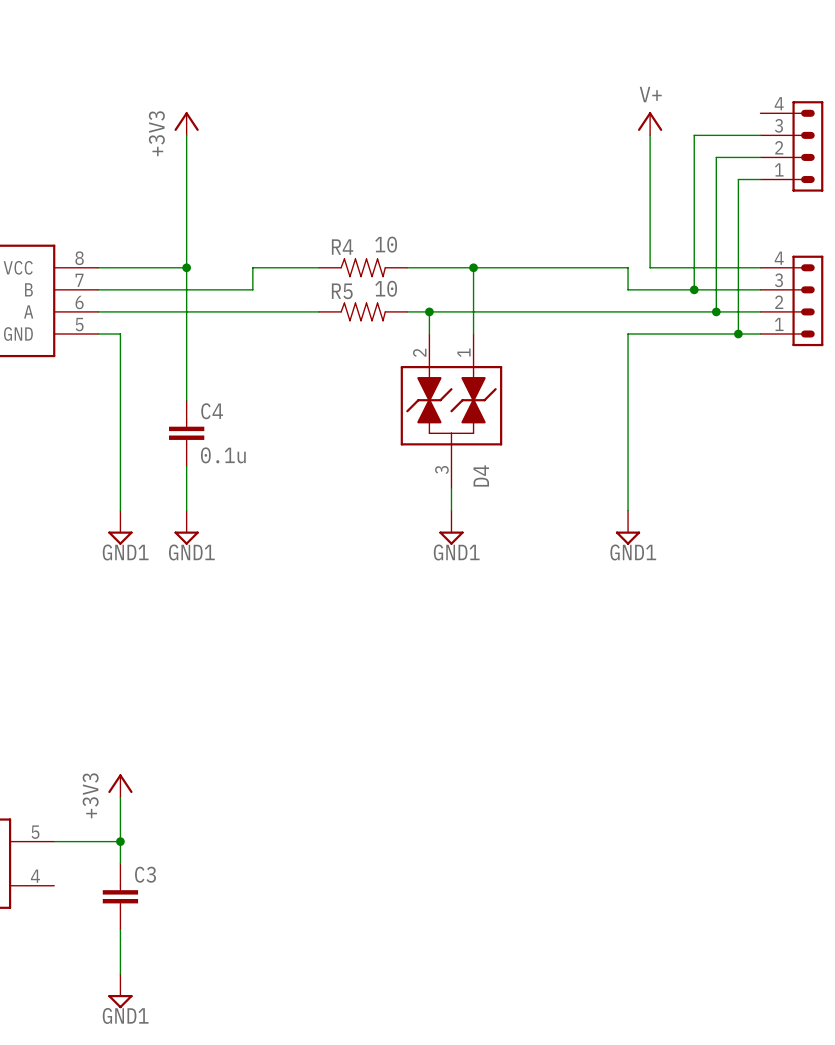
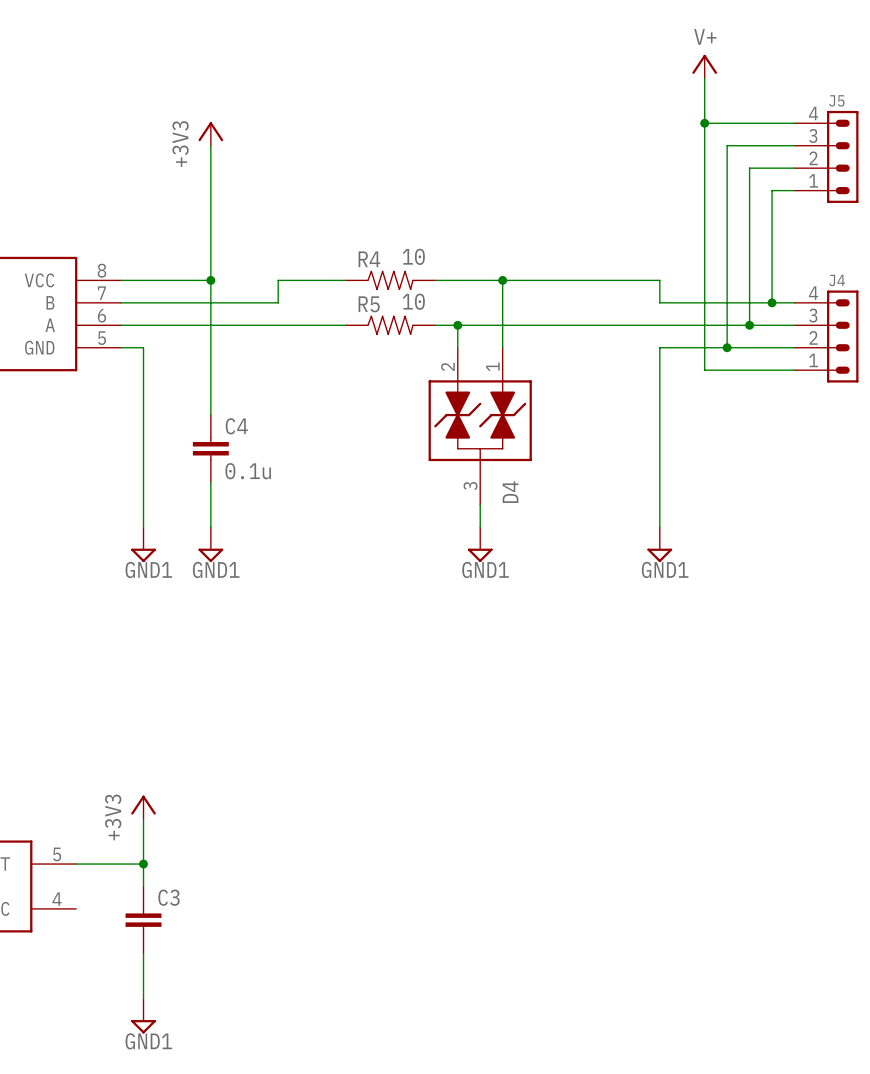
wire: none -> (704, 78) (704, 370) (794, 370)
J5 name: none -> J5 (836, 100)
wire: none -> (704, 123) (794, 123)
junction: none -> (704, 123)
power symbol position: V+ (650, 123) -> V+ (704, 66)
wire: (650, 135) (650, 267) (760, 267) -> none
junction: (694, 289) -> none
wire: (738, 289) (738, 334) -> (727, 302) (727, 347)
junction: none -> (772, 302)
part: (791, 300) -> none
J4: none -> (826, 336)
junction: none -> (727, 347)
junction: (738, 334) -> none

